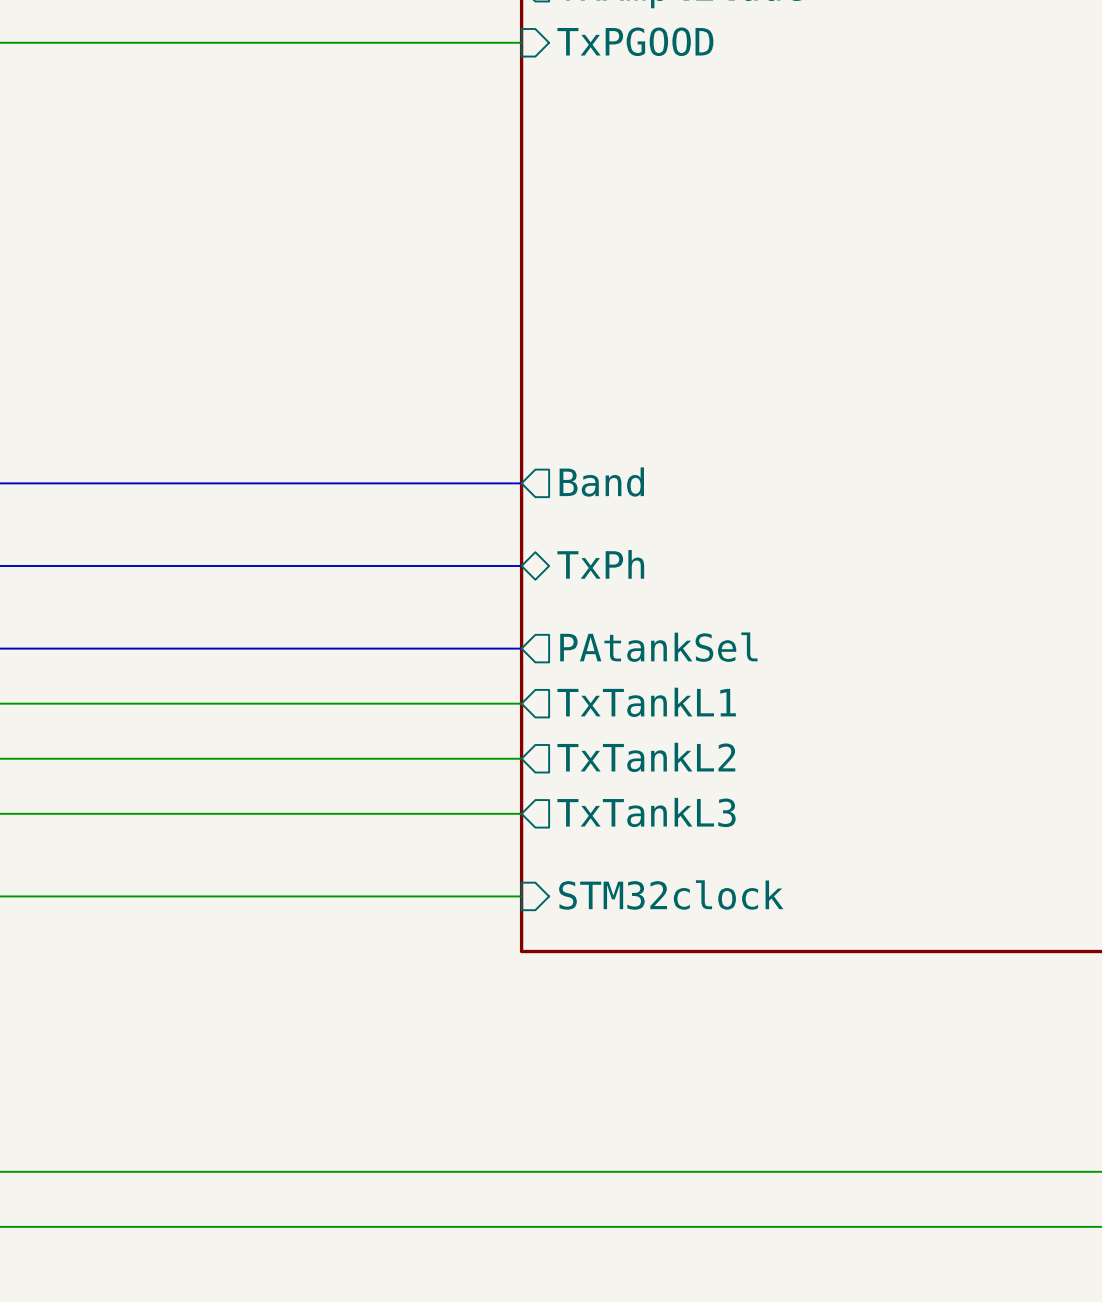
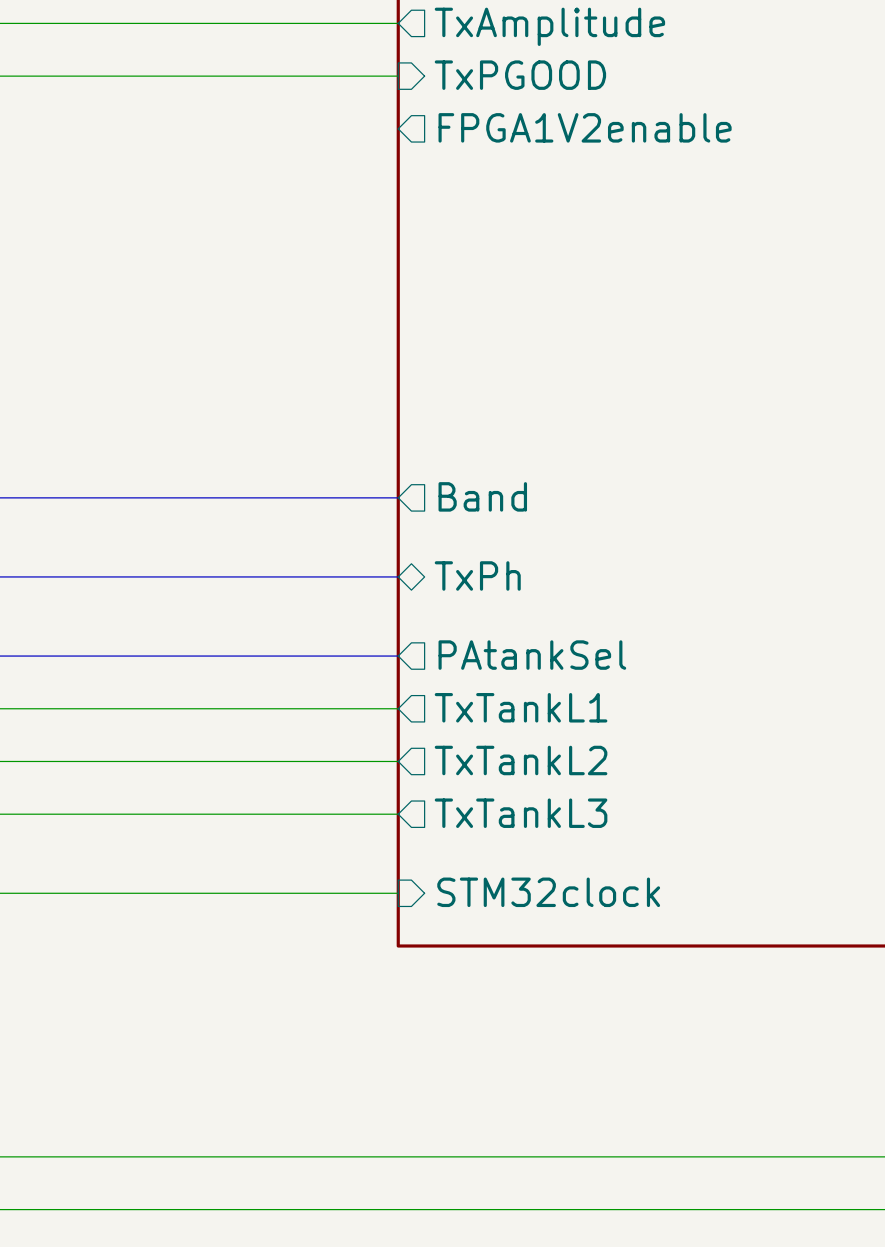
sheet pin: none -> FPGA1V2enable (585, 127)

